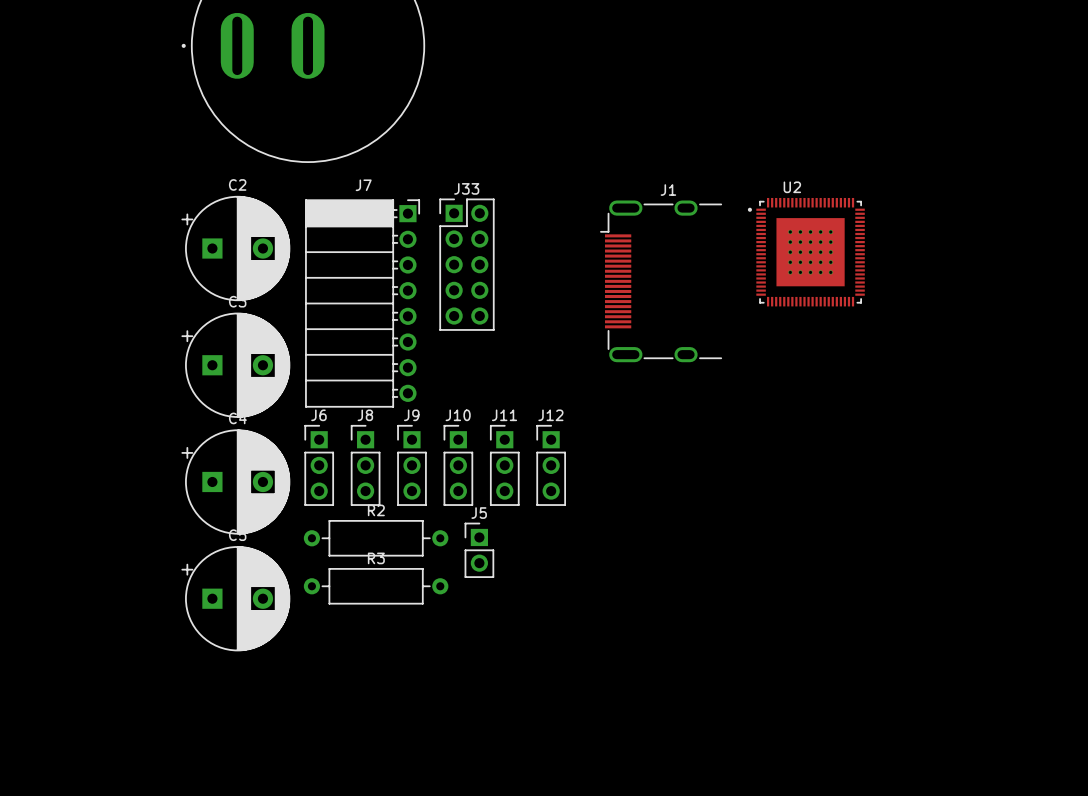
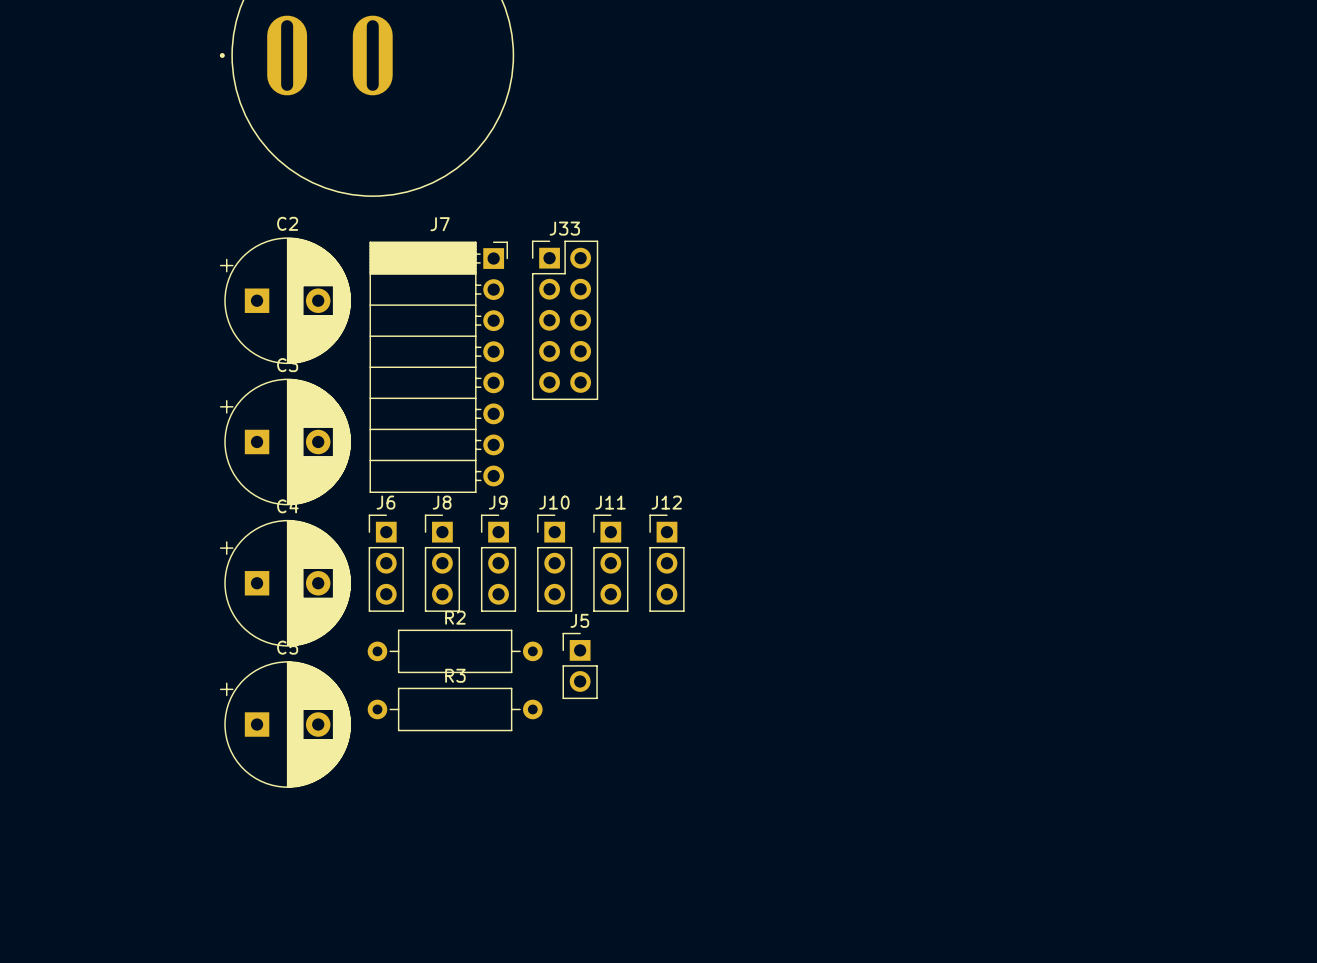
U2: (806, 252) -> none
J1: (661, 281) -> none

